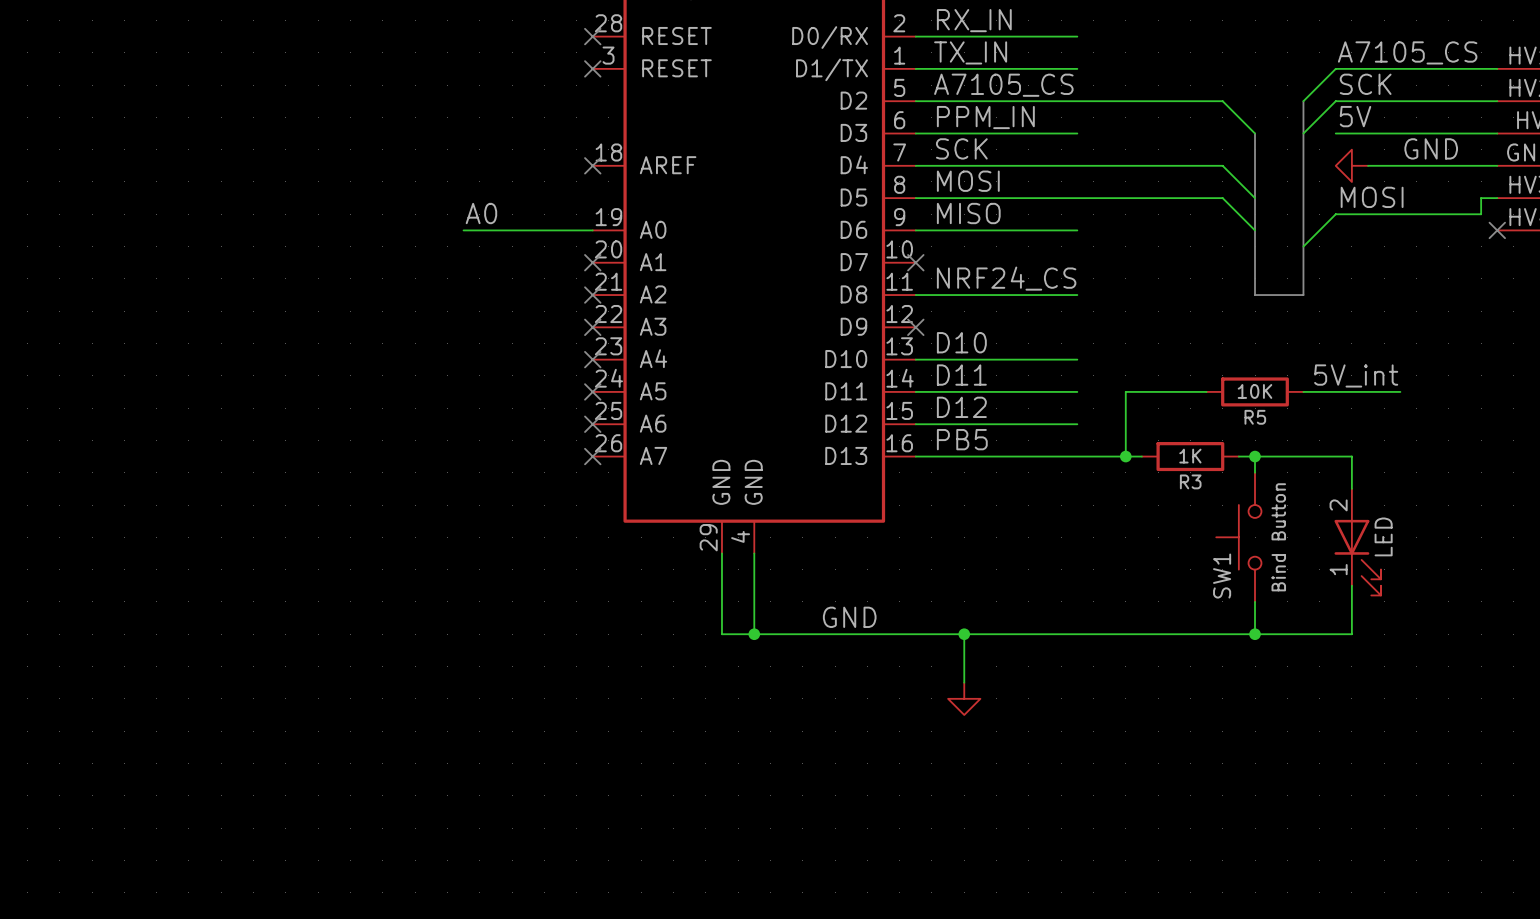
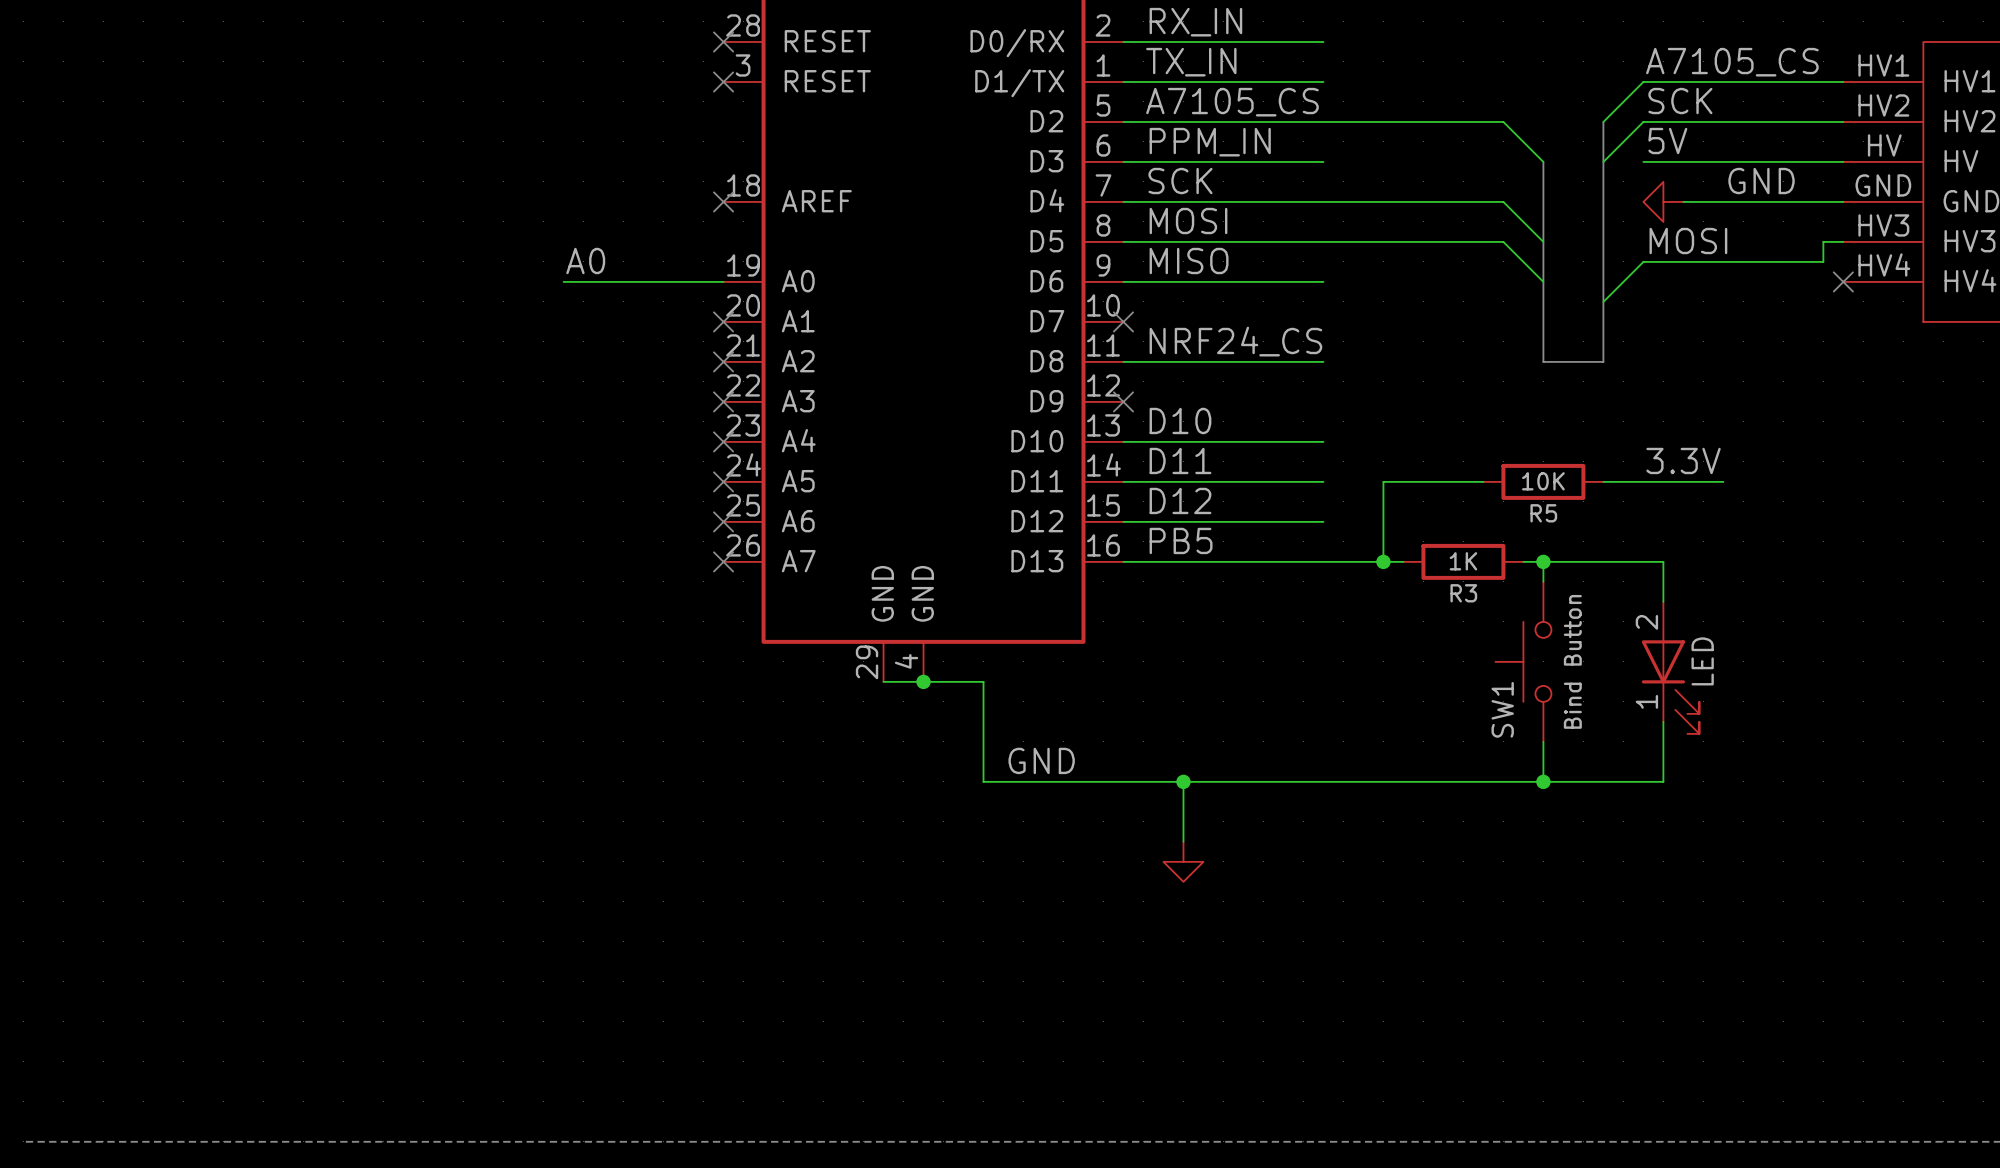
label: 5V_int (1356, 375) -> 3.3V (1683, 460)
wire: (721, 553) (721, 634) (802, 634) -> (883, 681) (983, 681) (983, 781)
wire: (754, 553) (754, 634) -> none
junction: none -> (923, 681)
junction: (754, 634) -> none

